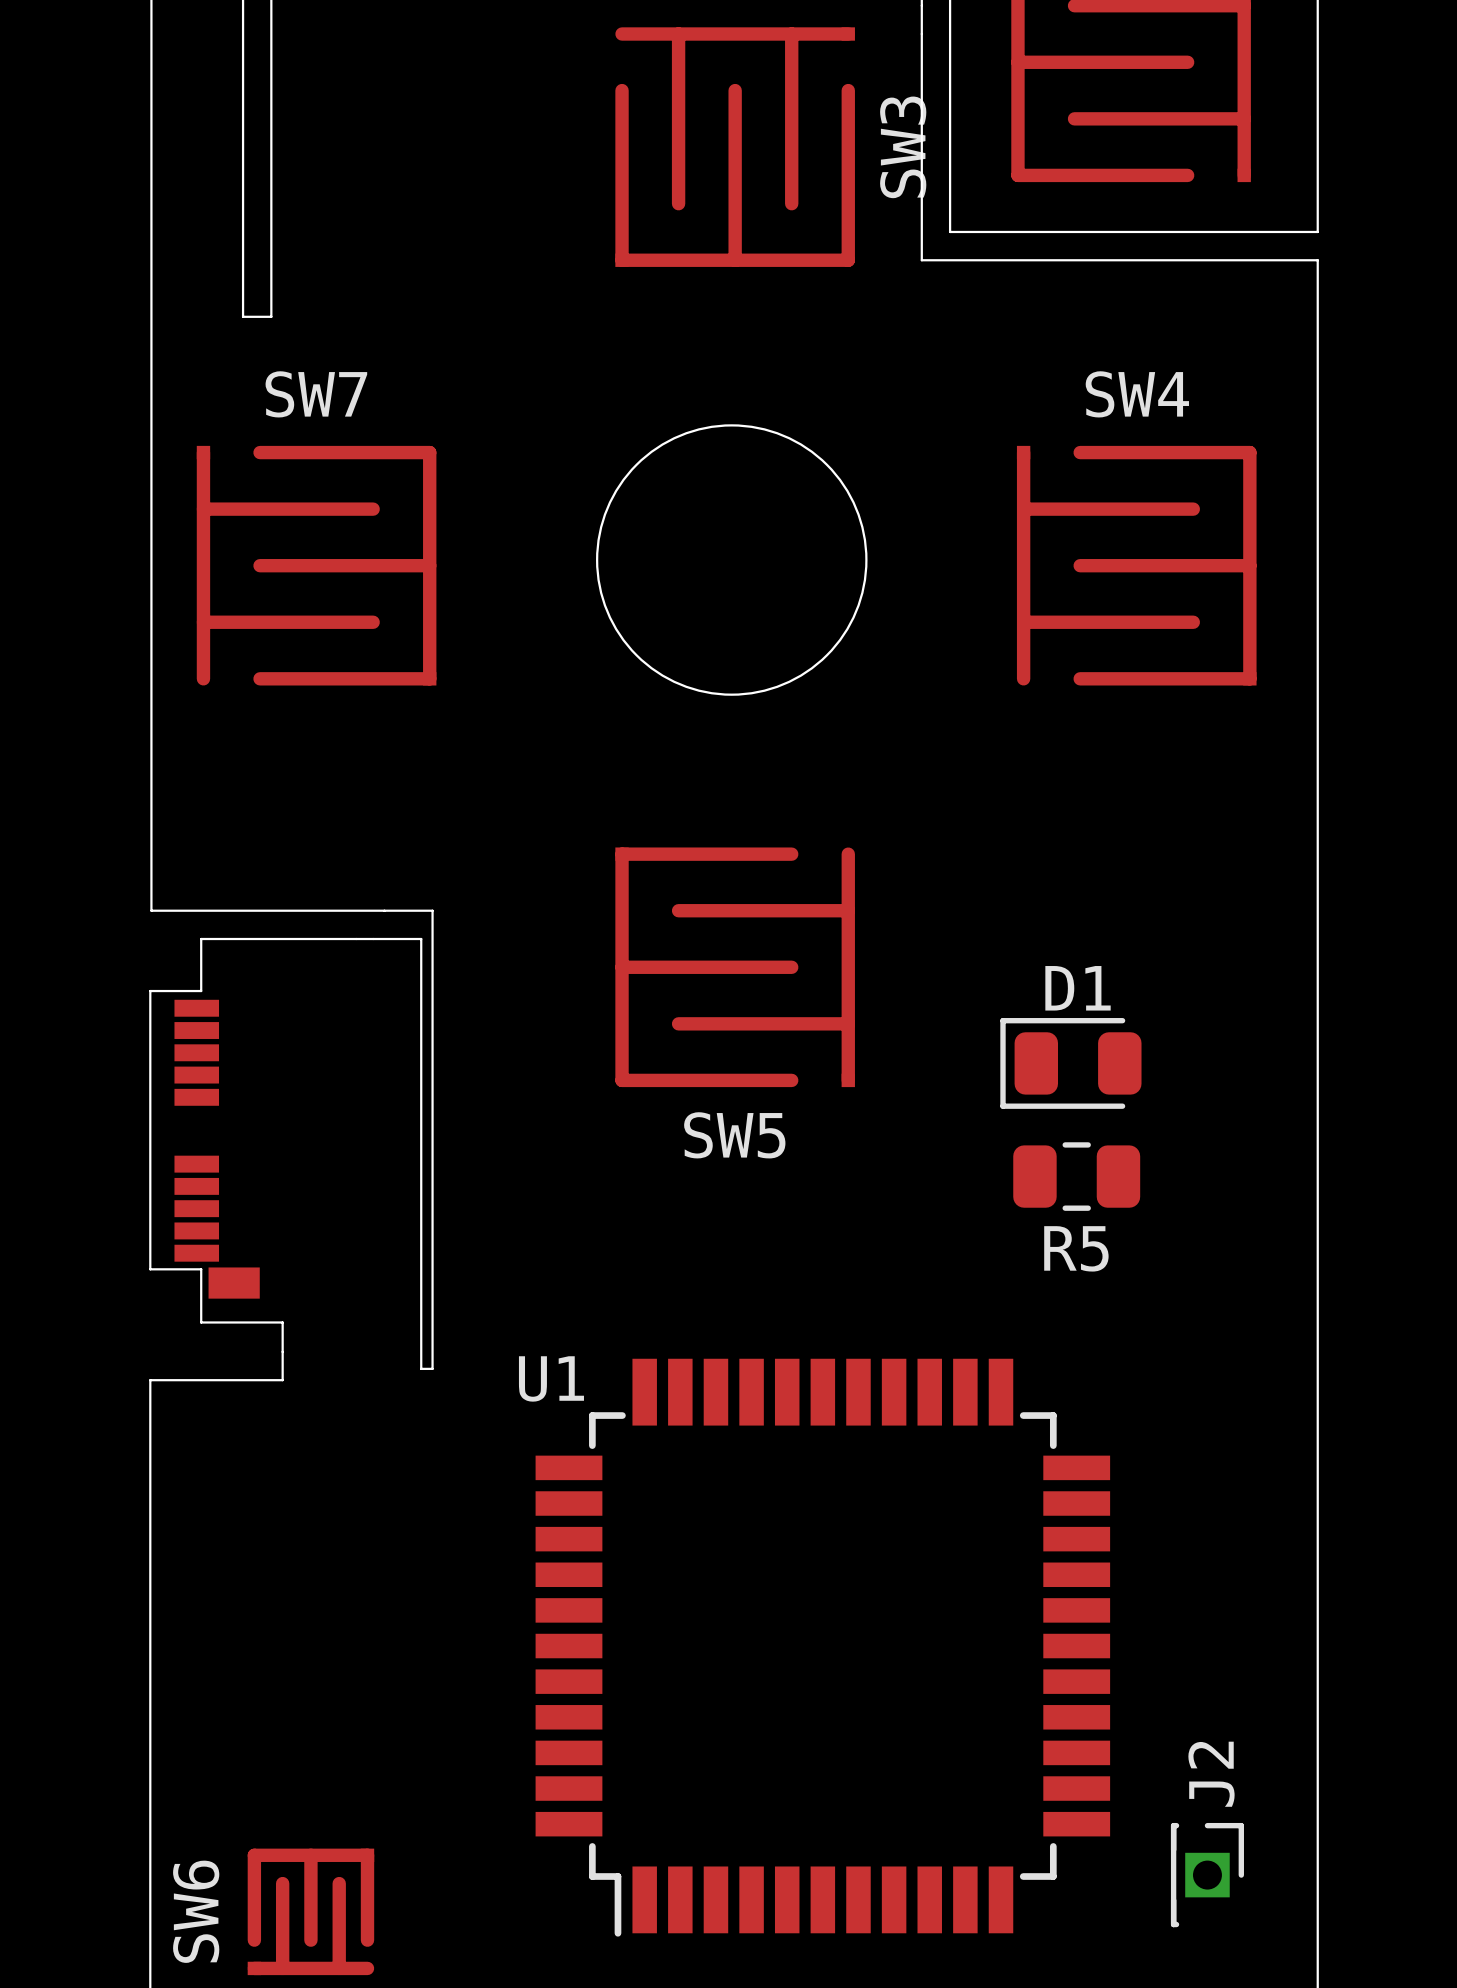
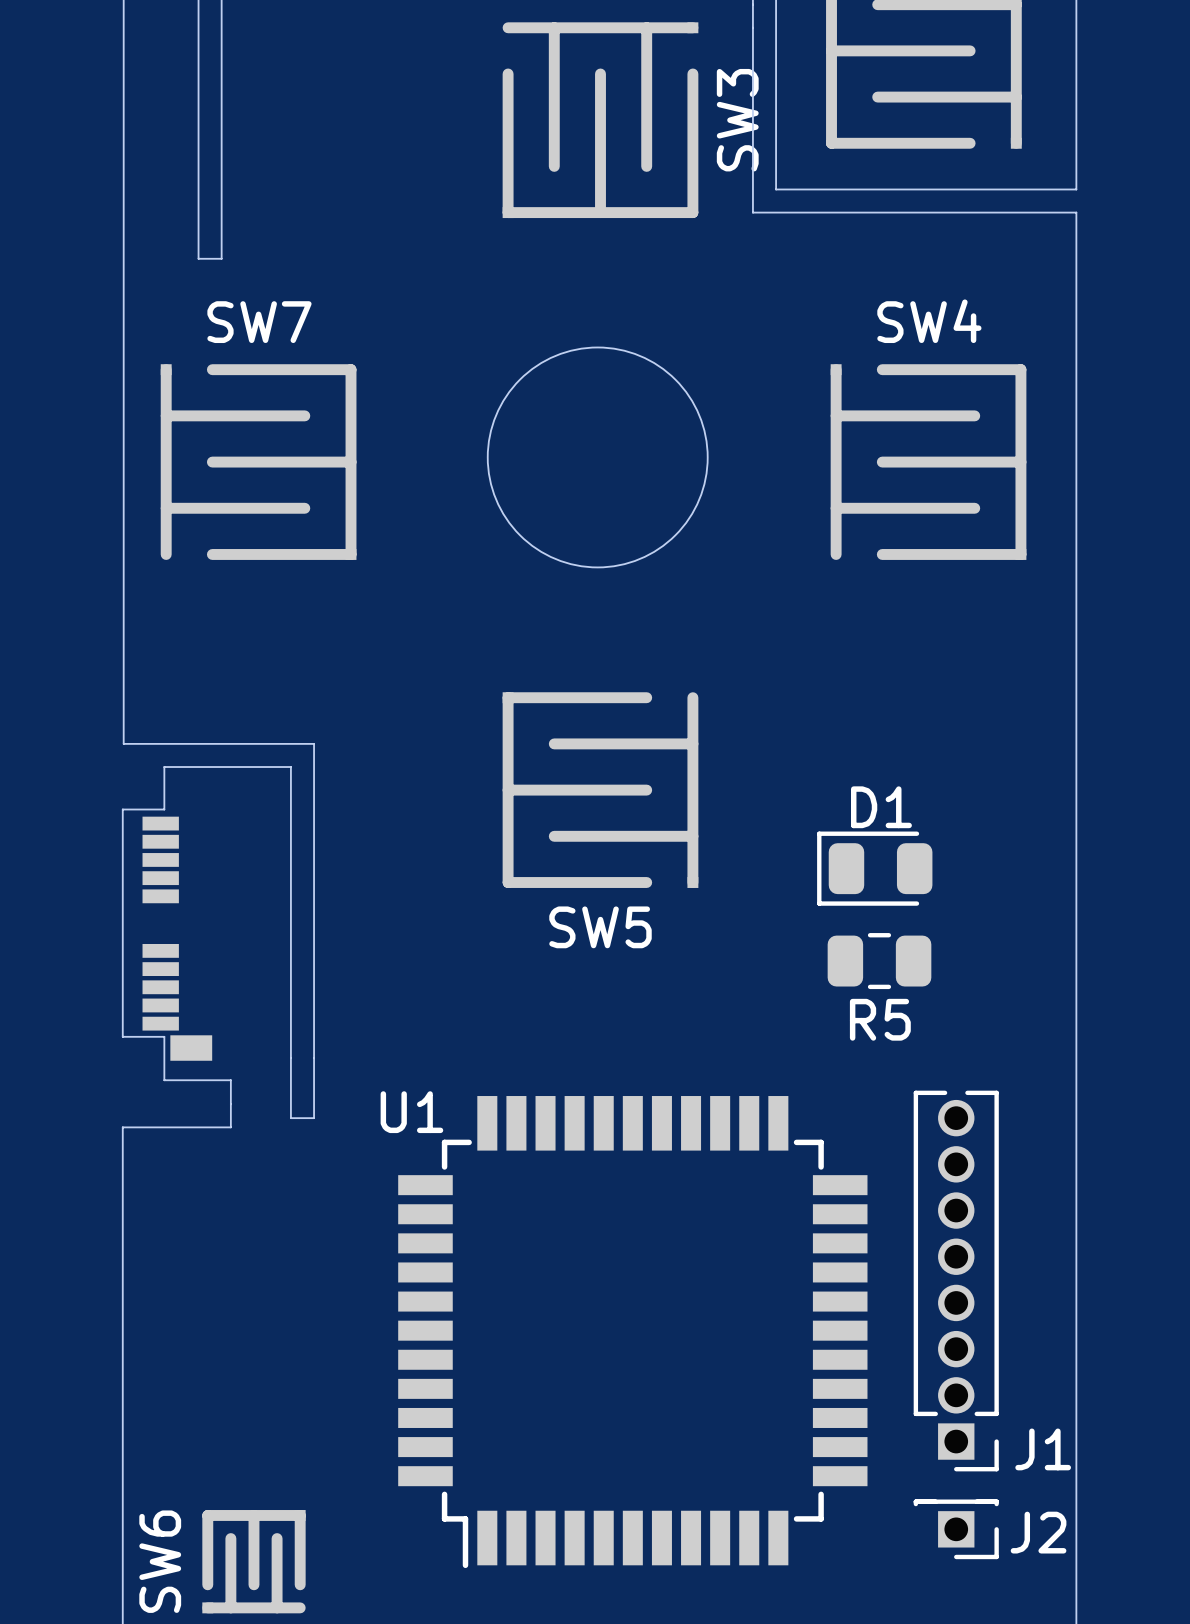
board edge: (384, 910) (432, 910) (432, 1368) (421, 1368) (421, 939) (356, 939) -> (314, 743) (314, 1118) (290, 1118) (290, 767)
J1: none -> (956, 1281)
U1 position: (822, 1647) -> (632, 1332)
J2 rotation: 0° (1207, 1875) -> 90° clockwise (956, 1529)

